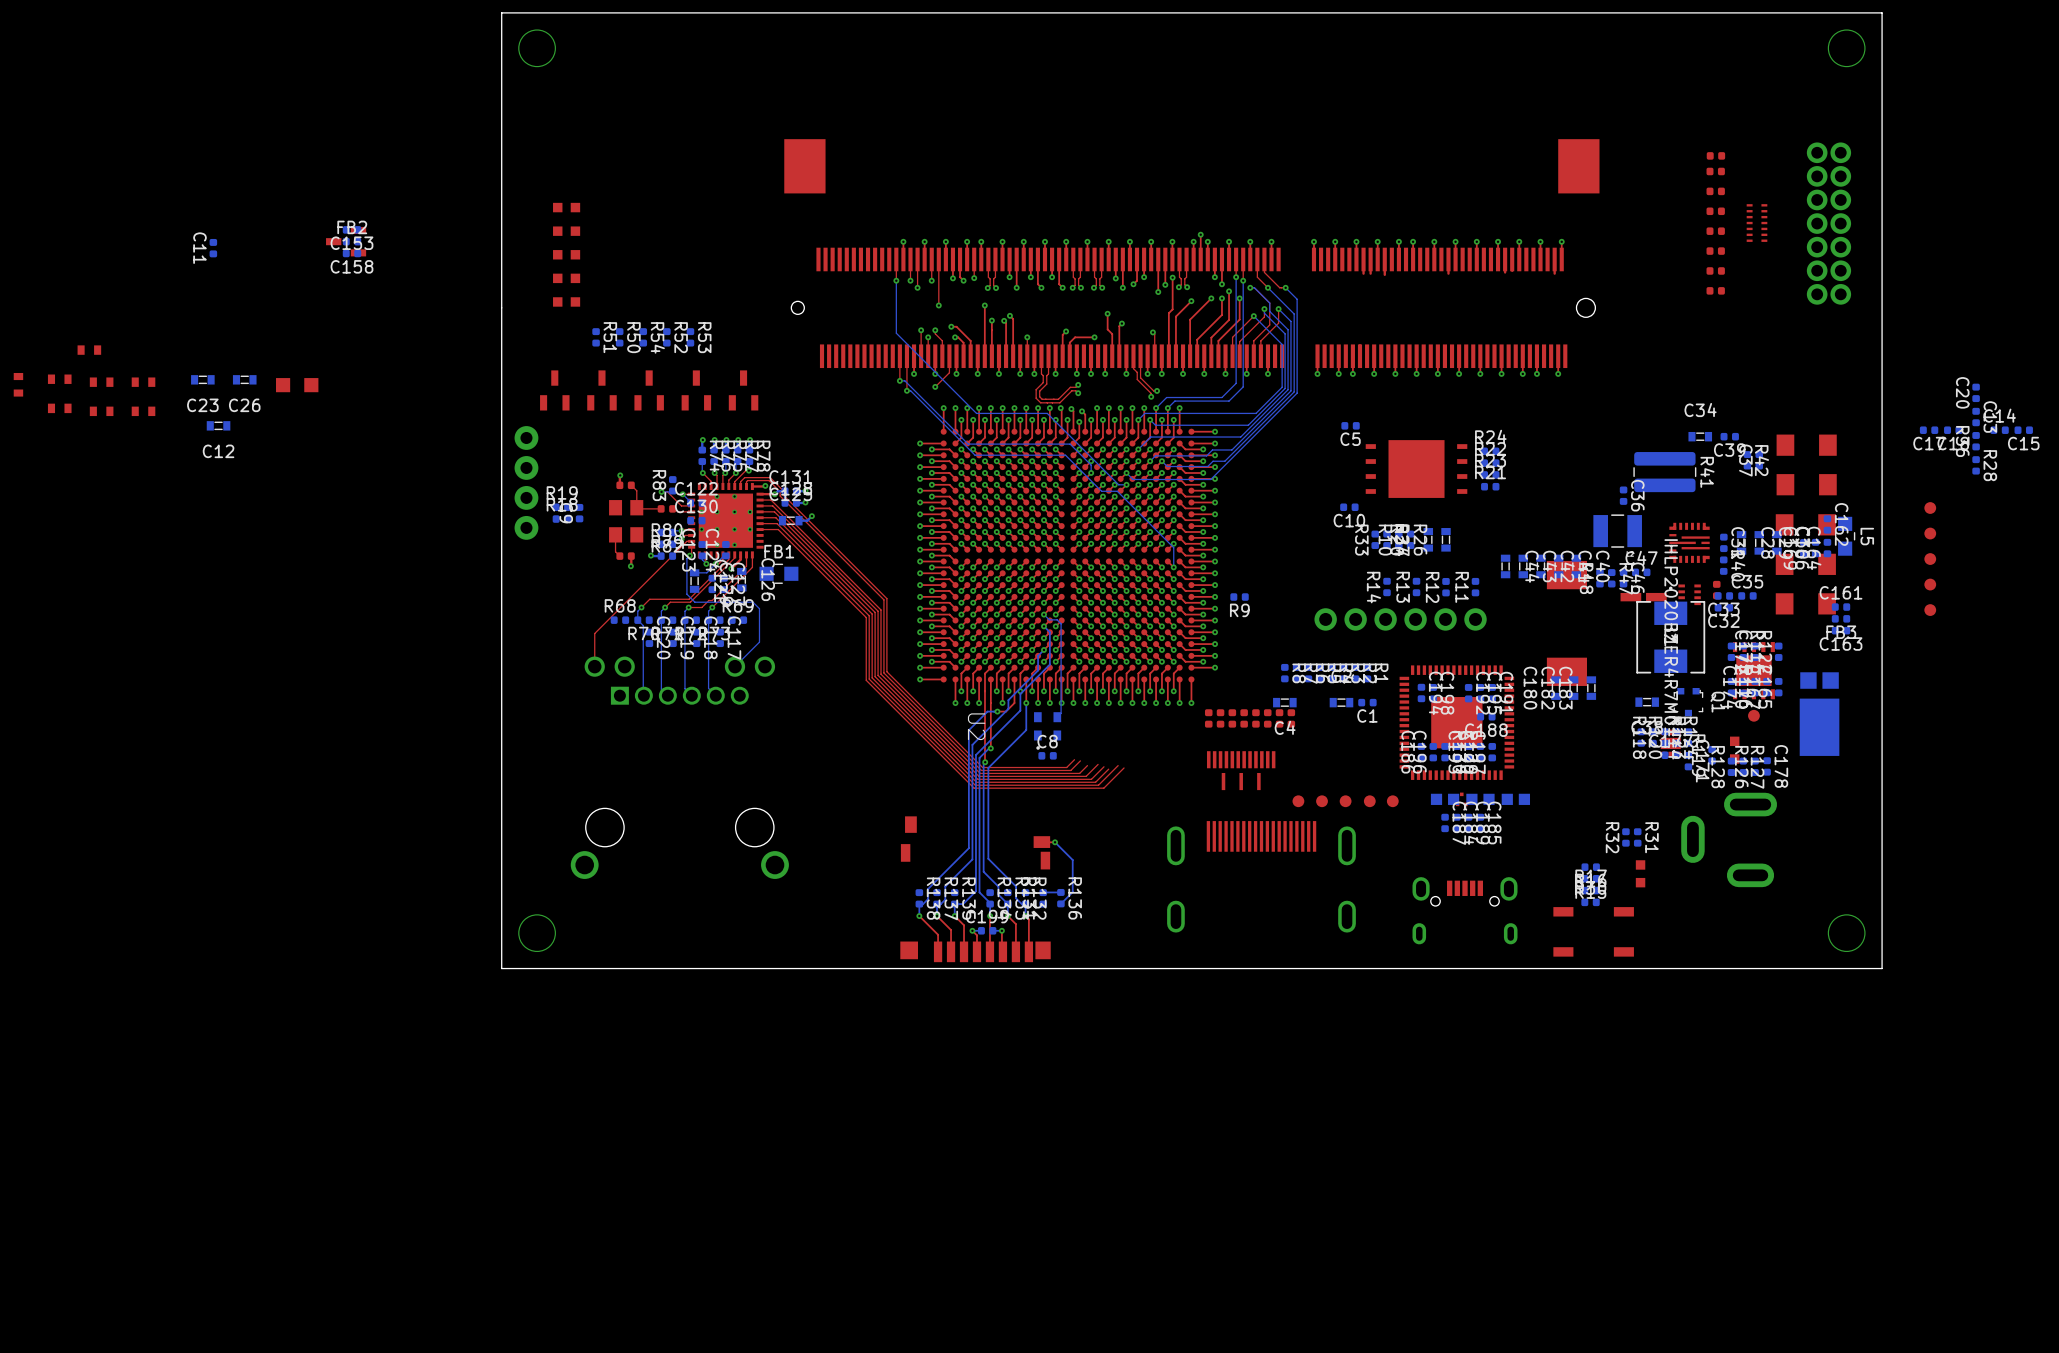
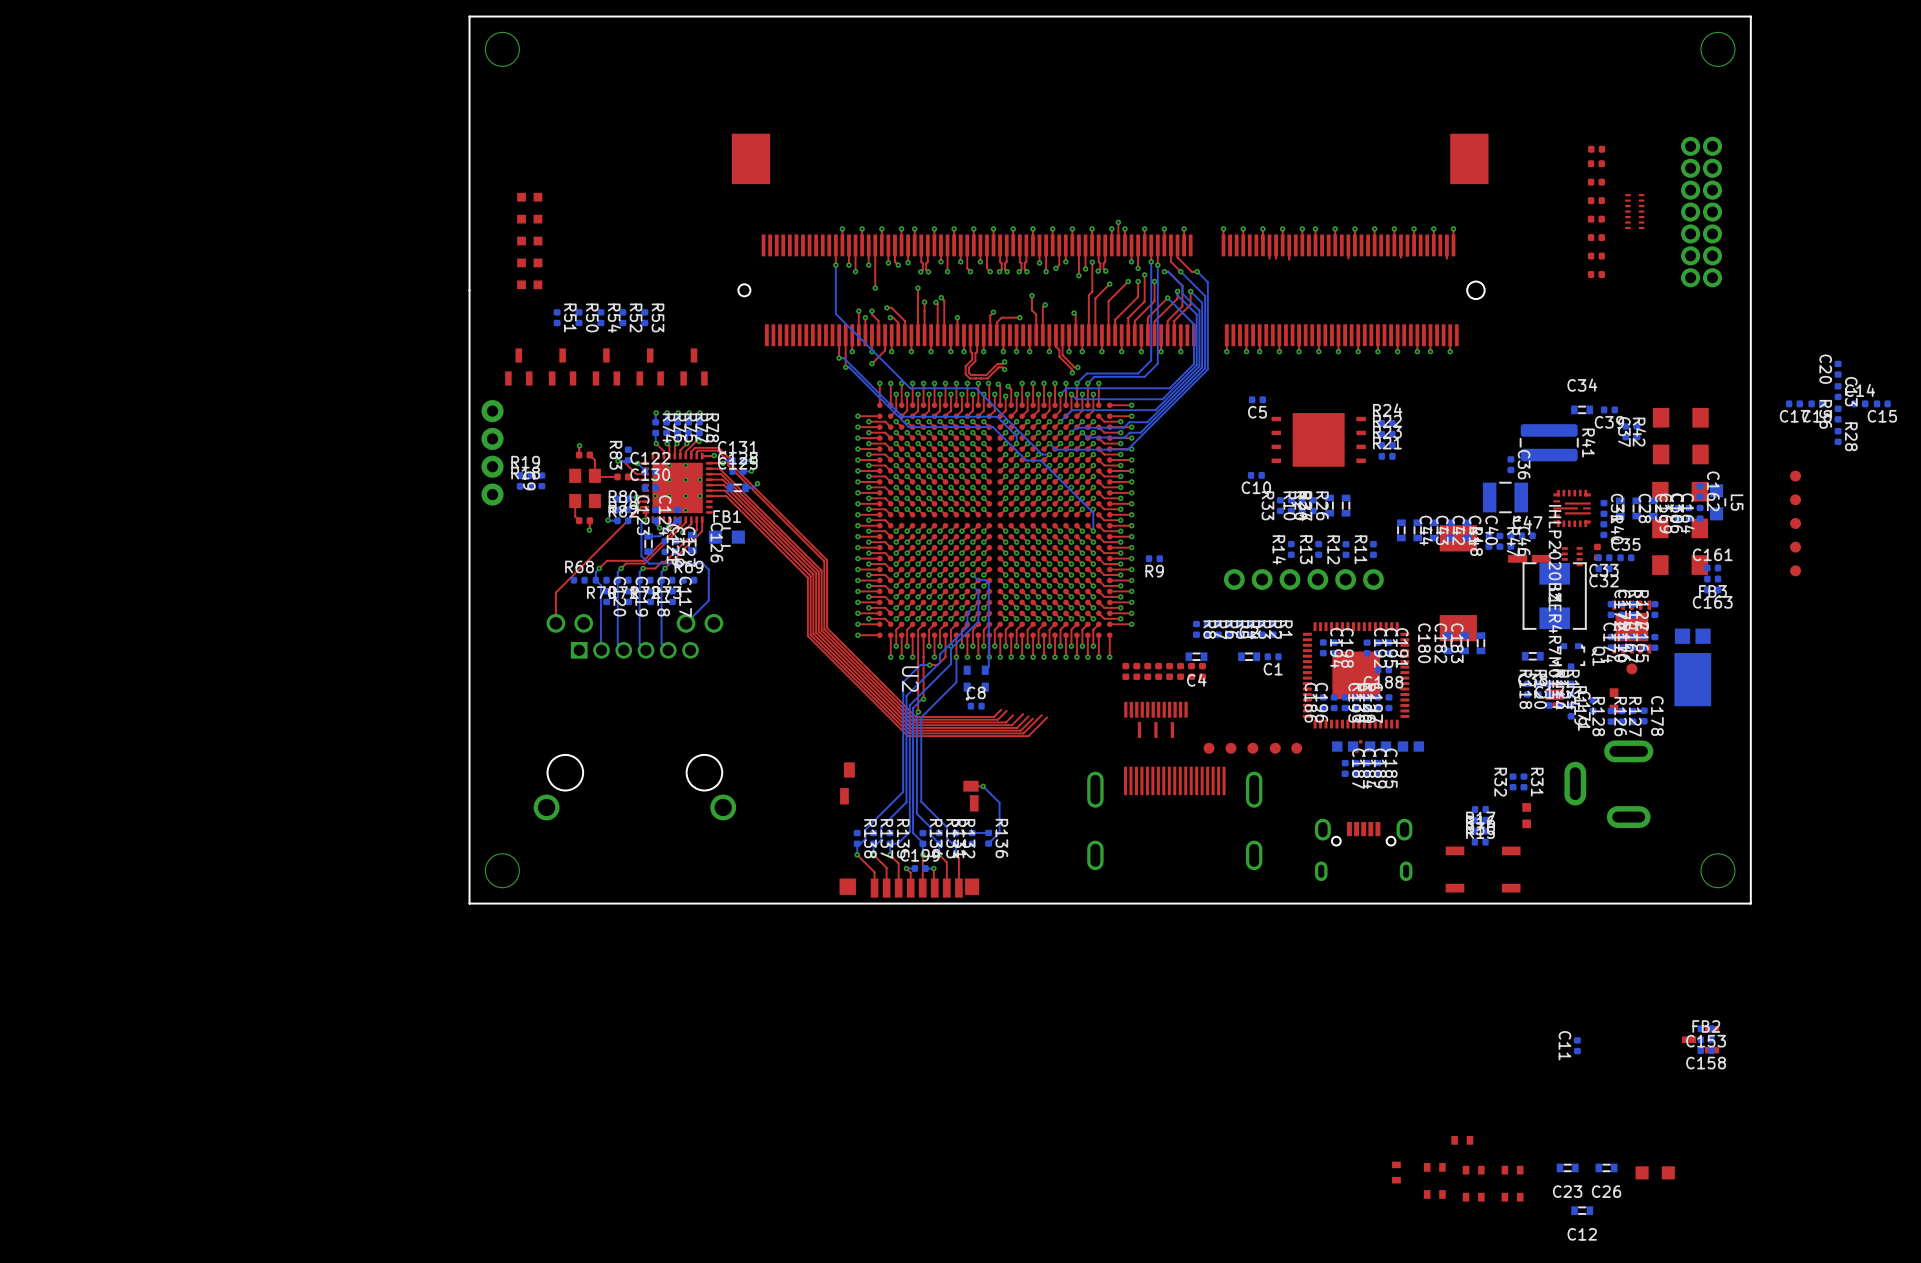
C153 position: (351, 229) -> (1706, 1028)
part: (346, 241) -> none
FB2 position: (351, 241) -> (1706, 1039)
C11 position: (213, 248) -> (1577, 1045)
C158 position: (351, 253) -> (1706, 1050)
part: (89, 350) -> none
part: (59, 379) -> none
C23 position: (202, 379) -> (1567, 1167)
C26 position: (244, 379) -> (1606, 1167)
part: (101, 382) -> none
part: (143, 382) -> none
part: (18, 384) -> none
part: (297, 385) -> none
part: (59, 408) -> none
part: (101, 411) -> none
part: (143, 411) -> none
C12 position: (218, 425) -> (1582, 1210)
part: none -> (1700, 1039)
part: none -> (1462, 1140)
part: none -> (1434, 1167)
part: none -> (1473, 1170)
part: none -> (1512, 1170)
part: none -> (1396, 1172)
part: none -> (1655, 1172)
part: none -> (1434, 1194)
part: none -> (1473, 1197)
part: none -> (1512, 1197)

